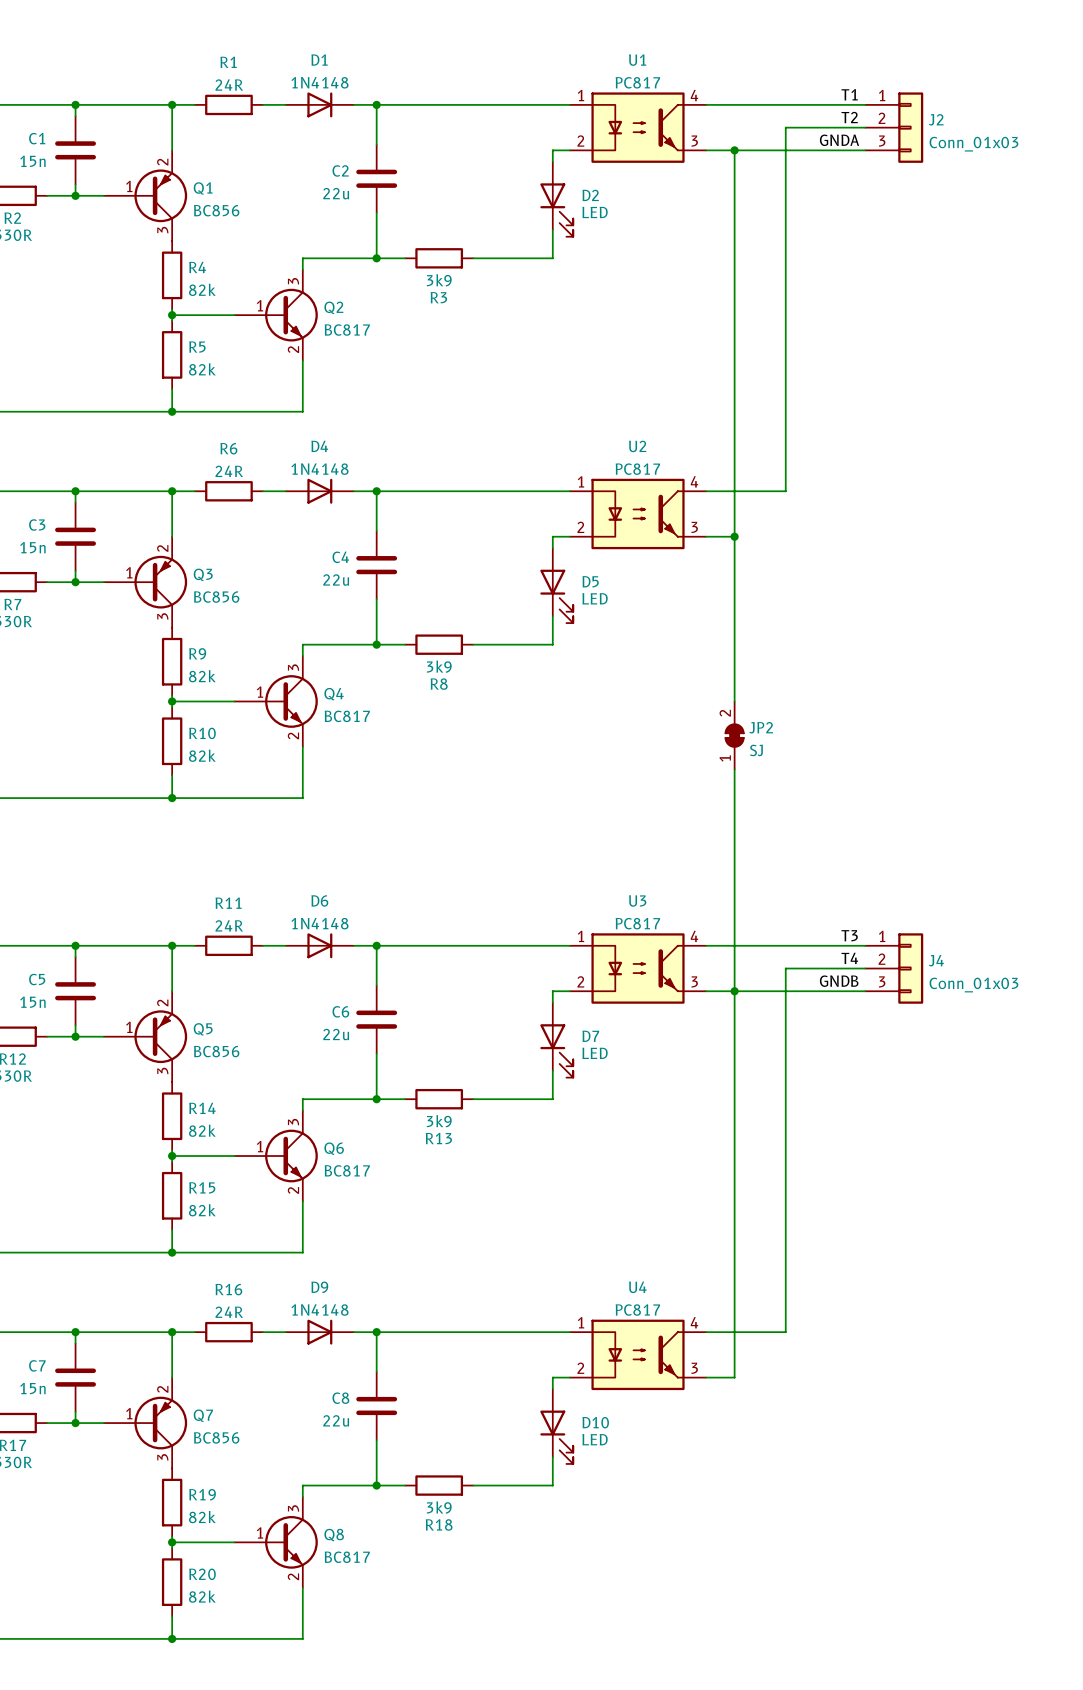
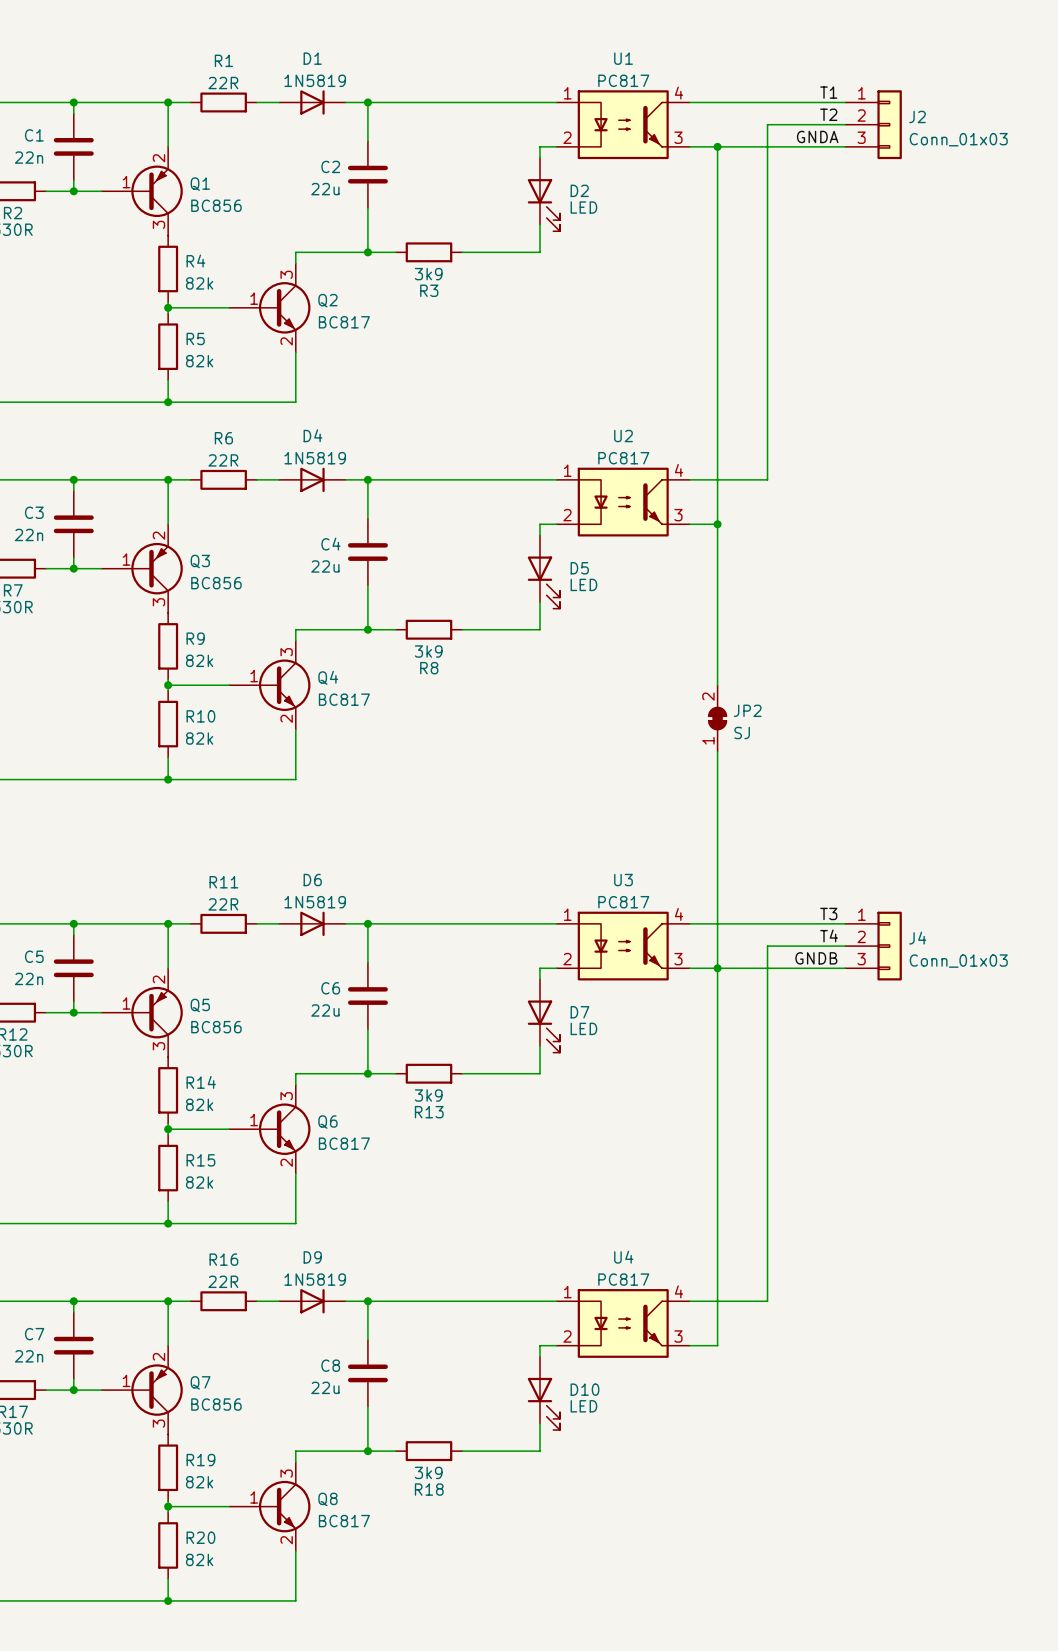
D1 value: 1N4148 (319, 82) -> 1N5819 (315, 80)
R1 value: 24R (229, 85) -> 22R (223, 83)
C1 value: 15n (32, 161) -> 22n (29, 157)
D4 value: 1N4148 (319, 469) -> 1N5819 (315, 458)
R6 value: 24R (229, 471) -> 22R (223, 460)
C3 value: 15n (32, 547) -> 22n (29, 534)
D6 value: 1N4148 (319, 923) -> 1N5819 (315, 902)
R11 value: 24R (229, 925) -> 22R (223, 904)
C5 value: 15n (32, 1002) -> 22n (29, 978)
D9 value: 1N4148 (319, 1310) -> 1N5819 (315, 1279)
R16 value: 24R (229, 1312) -> 22R (223, 1281)
C7 value: 15n (32, 1388) -> 22n (29, 1356)

